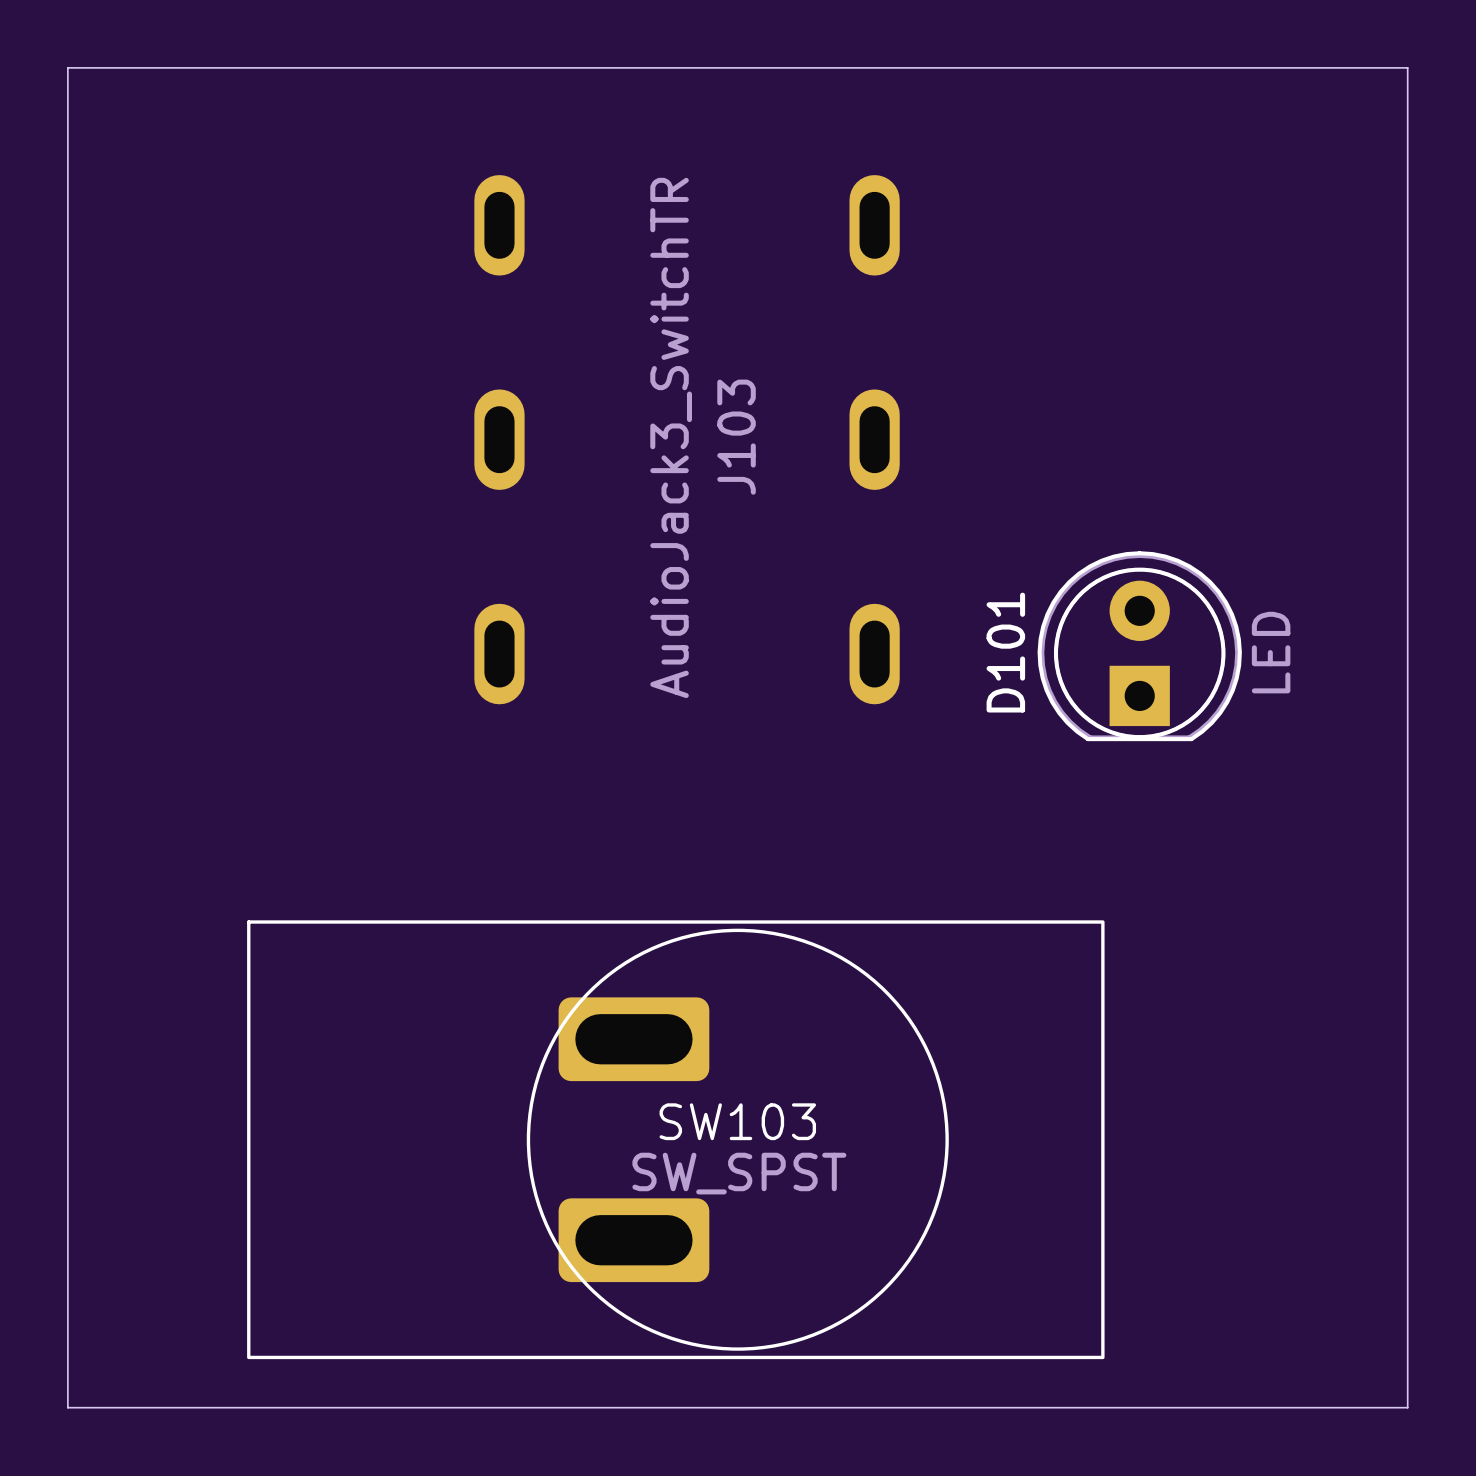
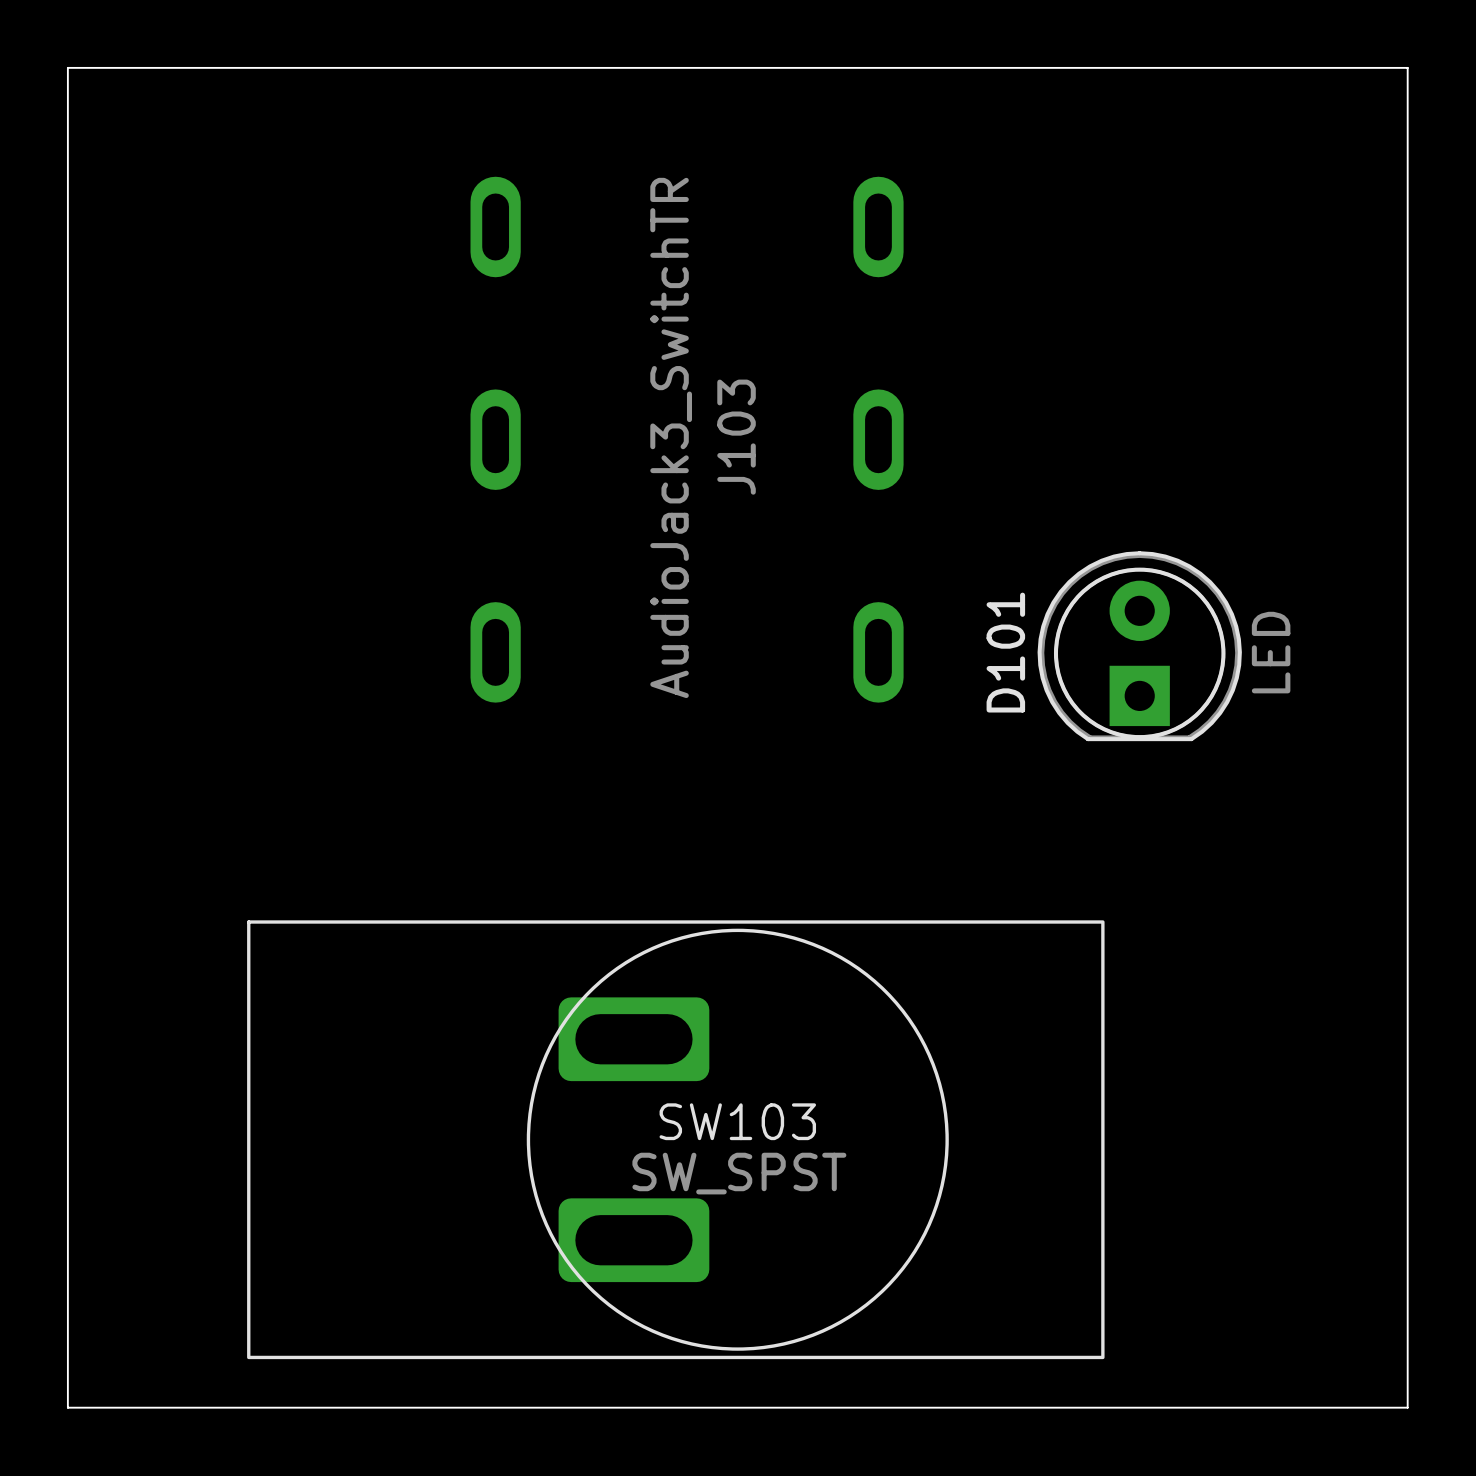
J103 footprint: [474, 175, 900, 705] -> [470, 176, 904, 703]

